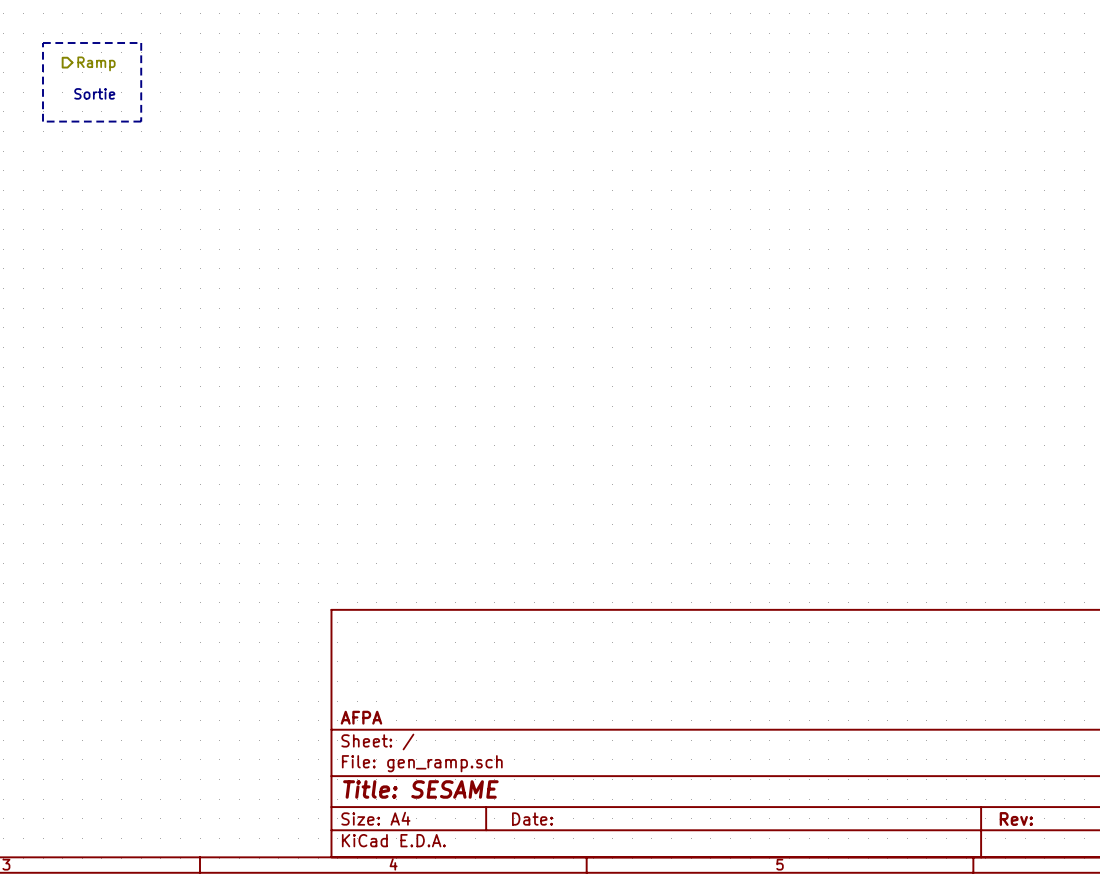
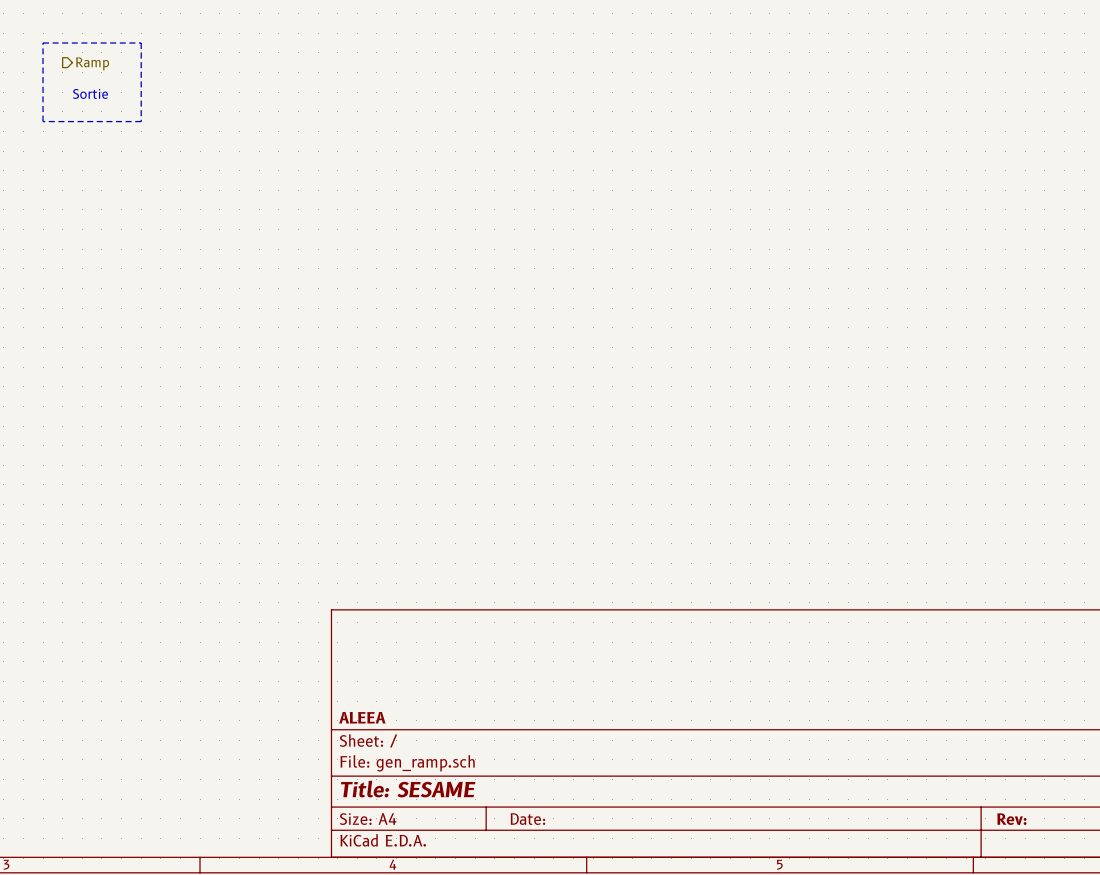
title block: AFPA (361, 717) -> ALEEA (362, 717)

